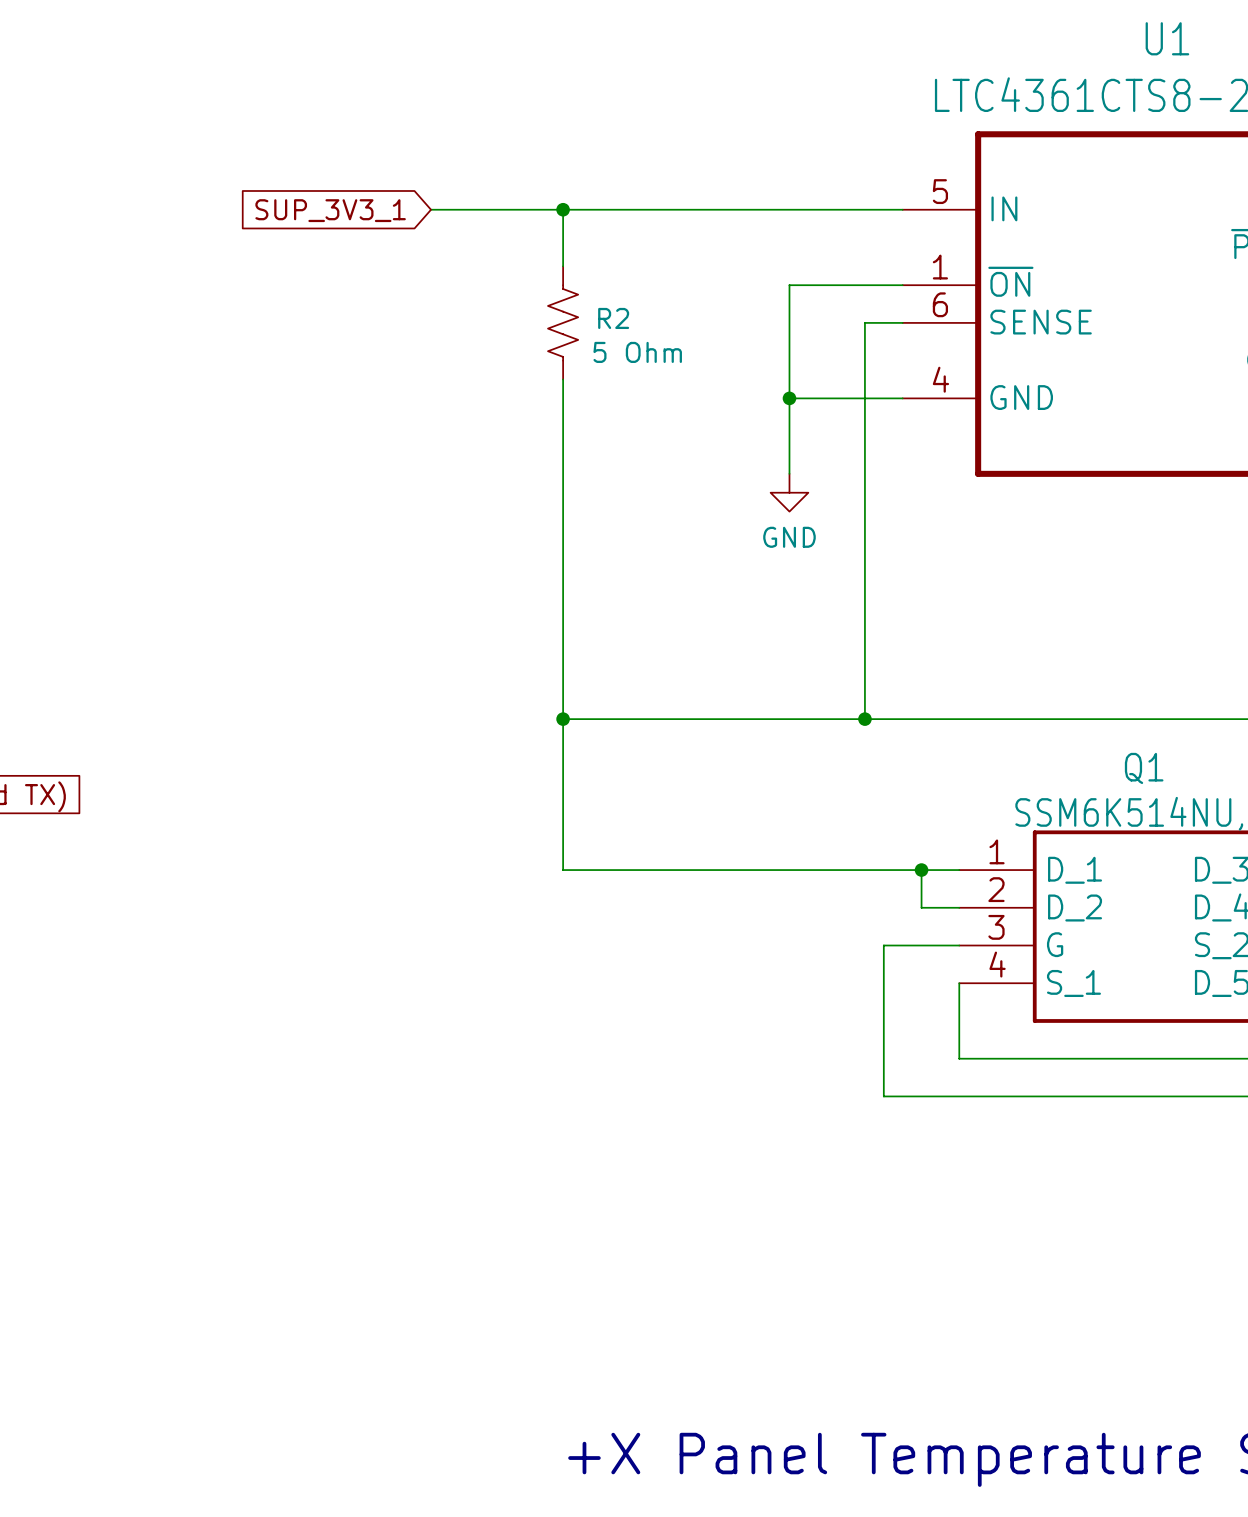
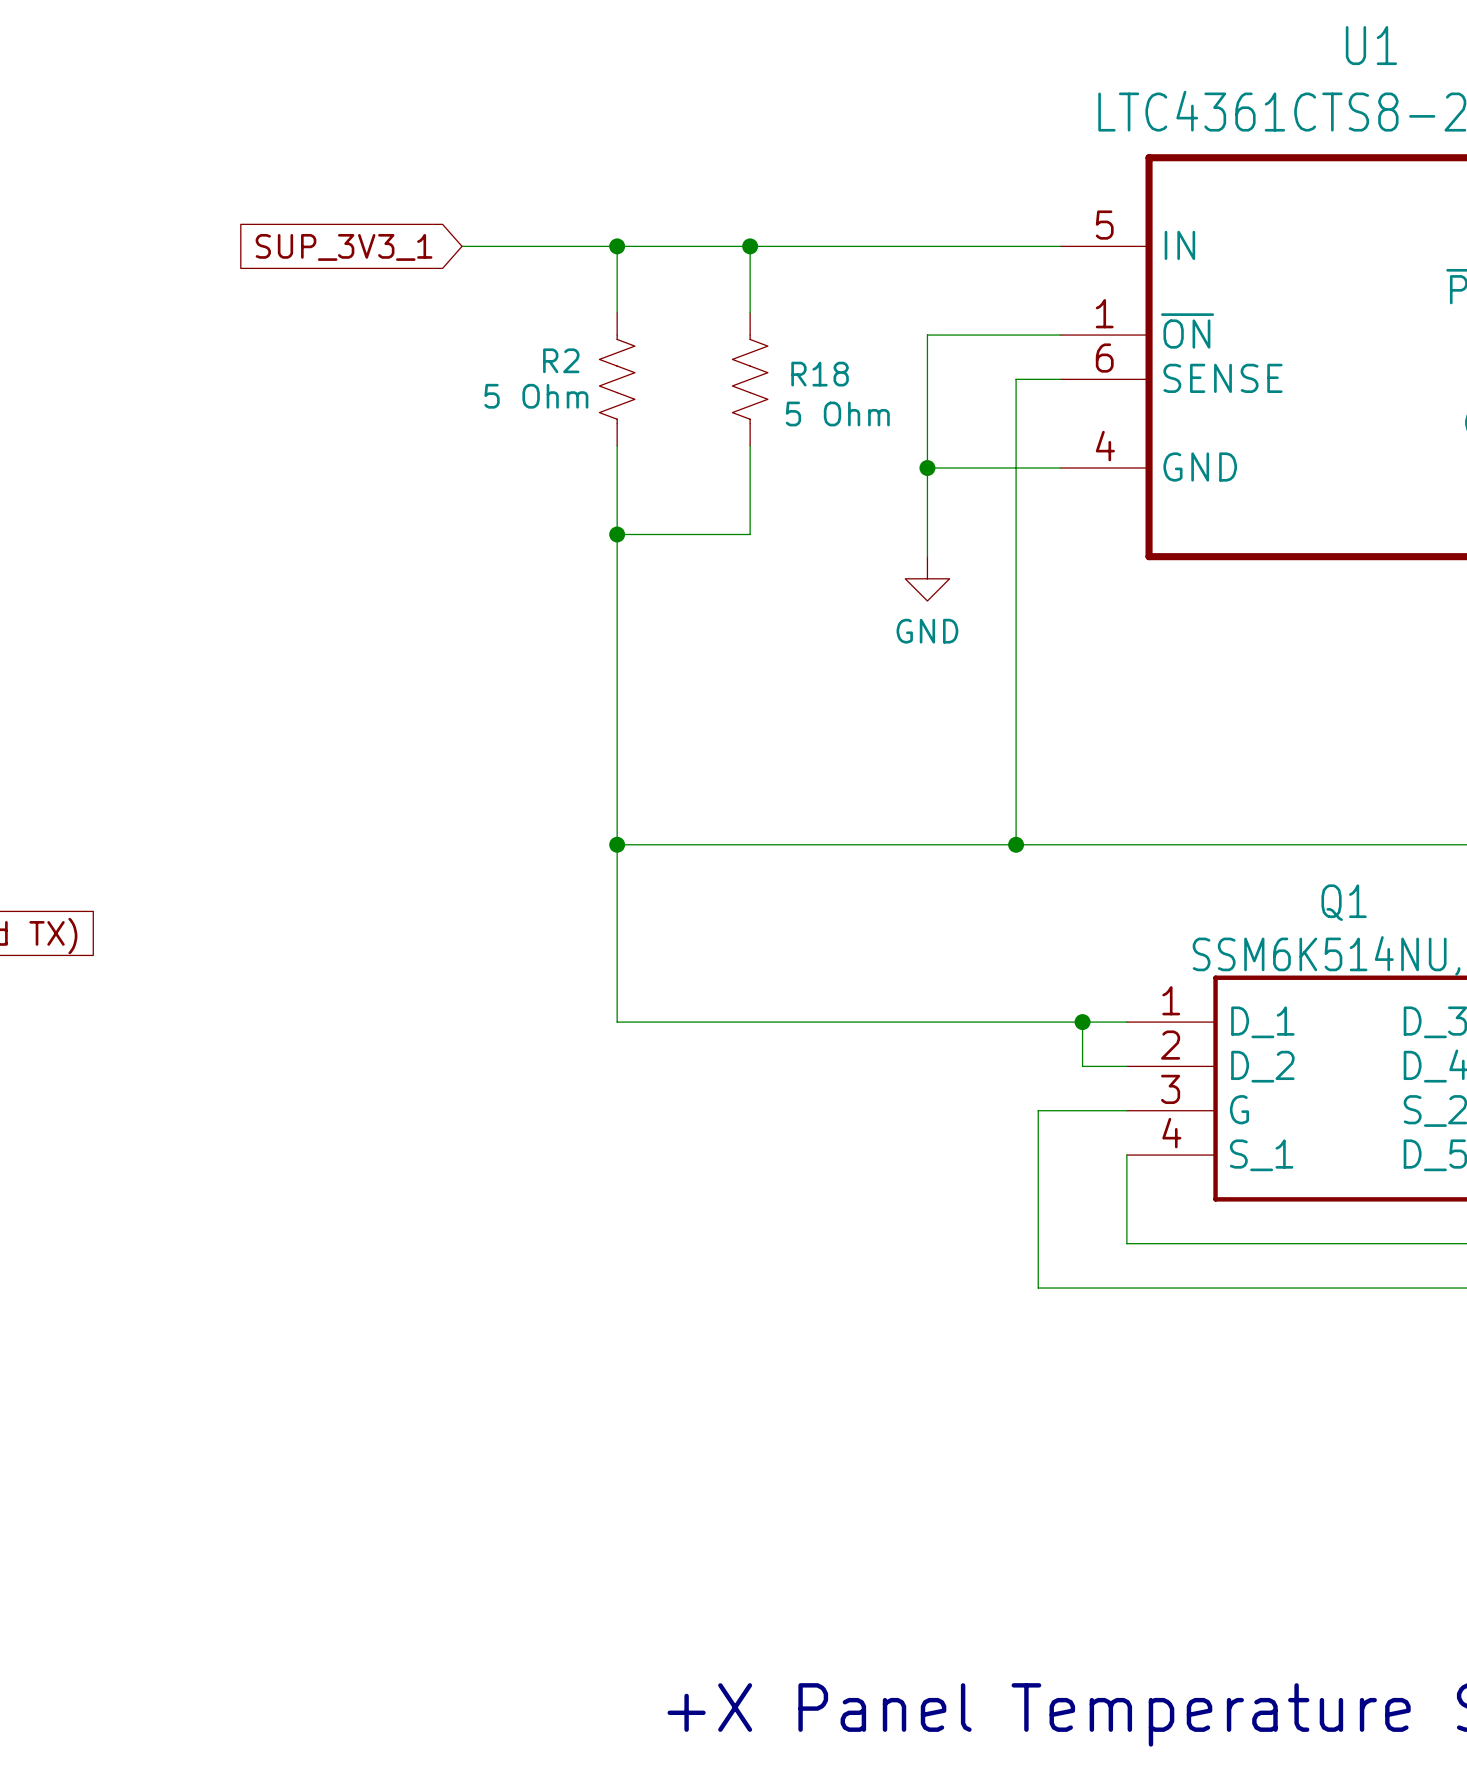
wire: none -> (462, 246) (506, 246)
junction: none -> (617, 246)
wire: (563, 209) (563, 266) -> (617, 246) (617, 312)
junction: (563, 209) -> none
wire: none -> (750, 246) (750, 312)
junction: none -> (750, 246)
global label position: SUP_3V3_1 (330, 210) -> SUP_3V3_1 (344, 247)
R2 name position: R2 (613, 318) -> R2 (561, 360)
R2 position: (563, 322) -> (617, 379)
R18: none -> 5 Ohm (750, 379)
R2 value position: 5 Ohm (637, 352) -> 5 Ohm (536, 396)
wire: (563, 379) (563, 870) -> (617, 445) (617, 1022) (661, 1022)
wire: none -> (750, 445) (750, 534) (617, 534)
junction: none -> (617, 534)
wire: none -> (617, 844) (661, 844)
junction position: (563, 719) -> (617, 844)

